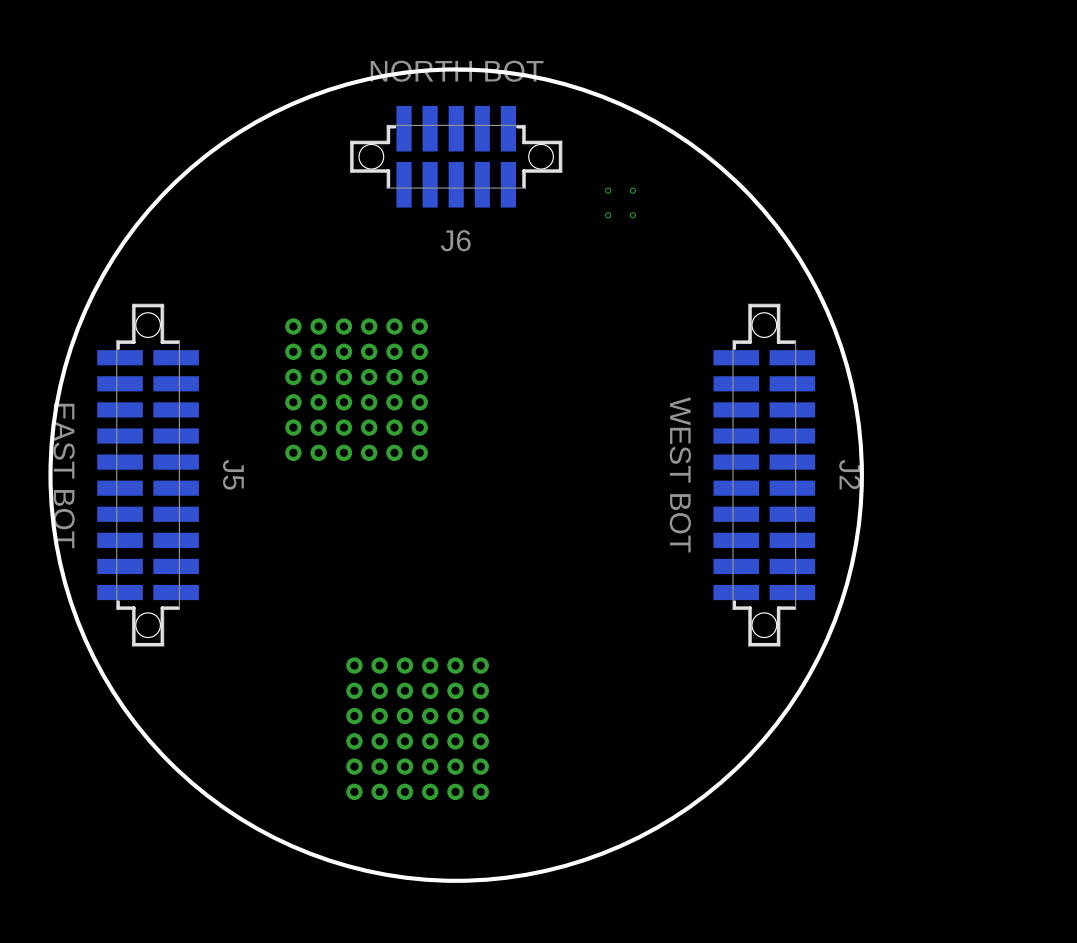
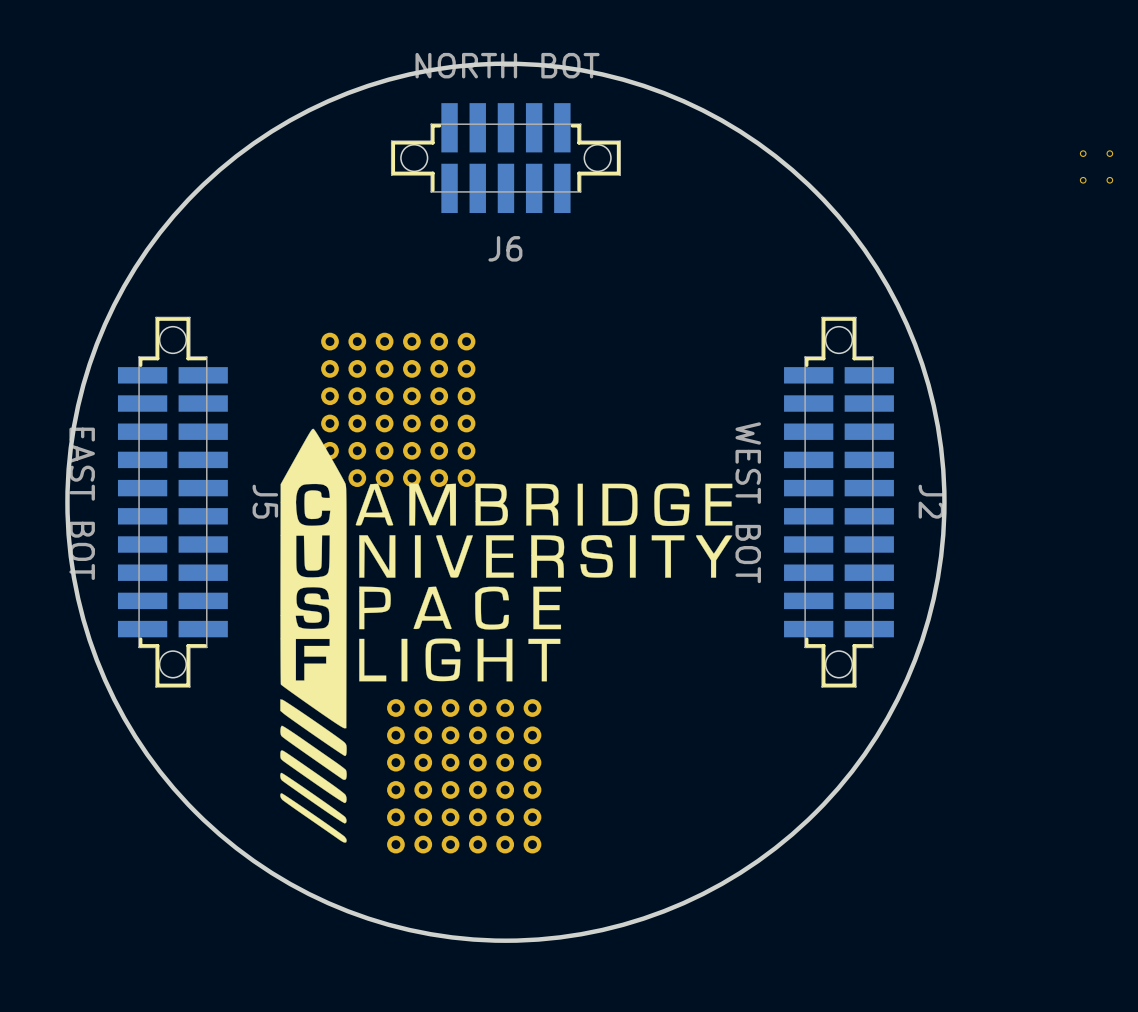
part position: (620, 202) -> (1096, 166)
drawing: none -> [280, 428, 733, 843]

